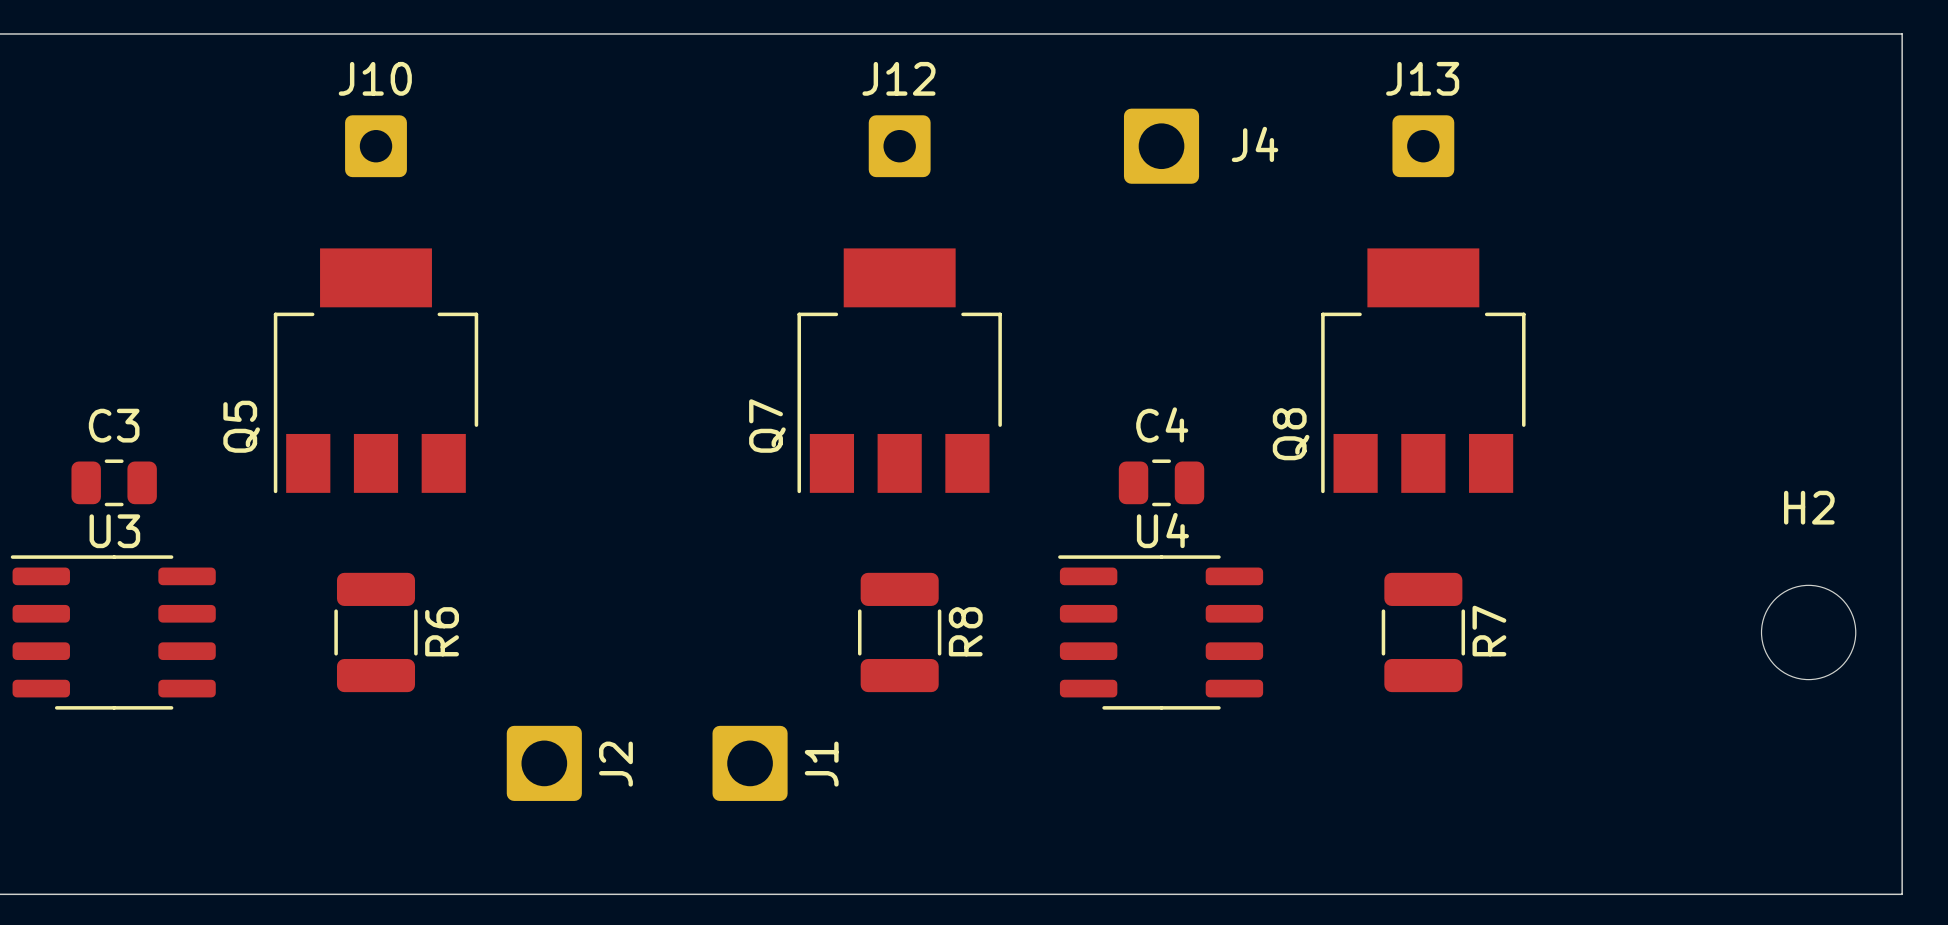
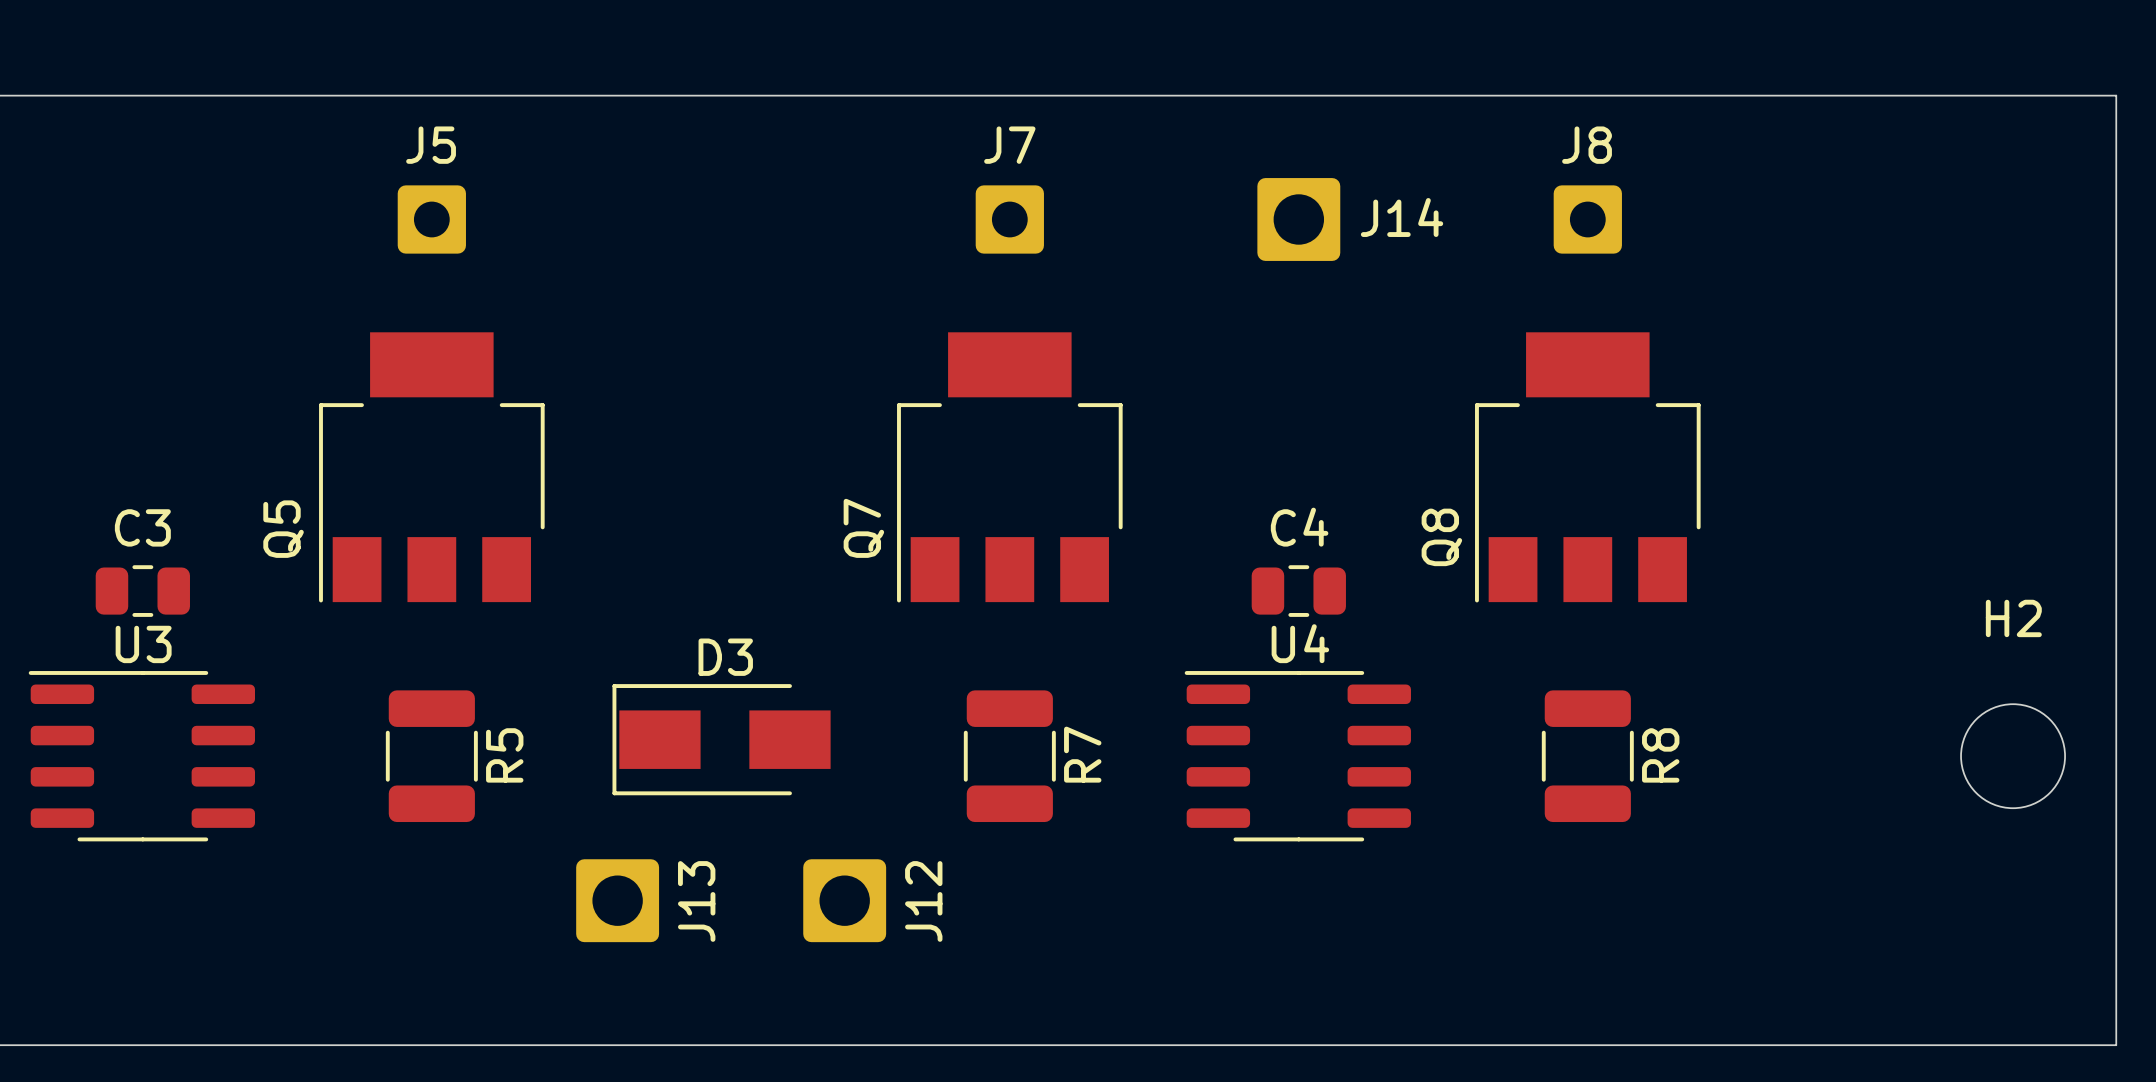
J10 name: J10 (375, 78) -> J5 (431, 145)
J12 name: J12 (898, 78) -> J7 (1009, 145)
J13 name: J13 (1422, 78) -> J8 (1587, 145)
J4 name: J4 (1255, 144) -> J14 (1402, 217)
D3: none -> (721, 739)
R6 name: R6 (442, 631) -> R5 (504, 755)
R8 name: R8 (965, 631) -> R7 (1082, 754)
R7 name: R7 (1489, 631) -> R8 (1660, 755)
J2 name: J2 (615, 764) -> J13 (696, 901)
J1 name: J1 (821, 764) -> J12 (923, 901)

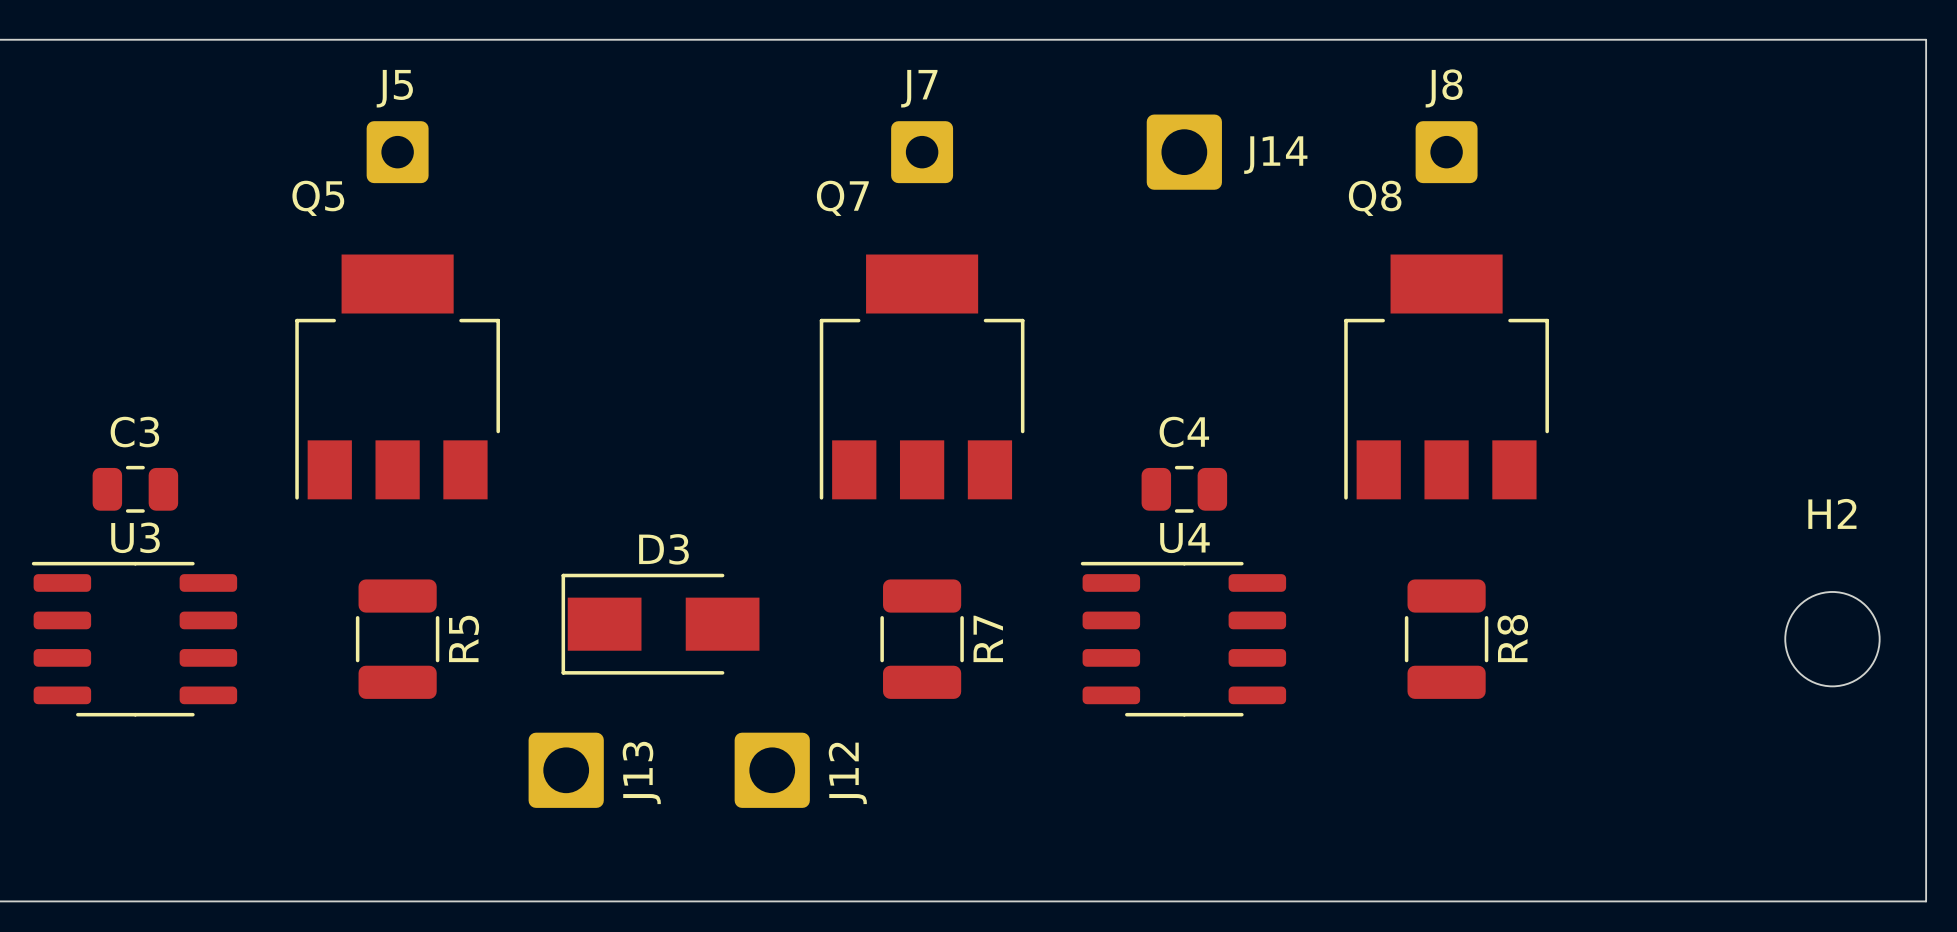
Q7 name rotation: 0° (863, 528) -> 90° clockwise (842, 198)
Q7 name position: Q7 (863, 528) -> Q7 (842, 198)
Q5 name rotation: 0° (283, 529) -> 90° clockwise (318, 198)
Q5 name position: Q5 (283, 529) -> Q5 (318, 198)
Q8 name rotation: 0° (1441, 537) -> 90° clockwise (1375, 198)
Q8 name position: Q8 (1441, 537) -> Q8 (1375, 198)

